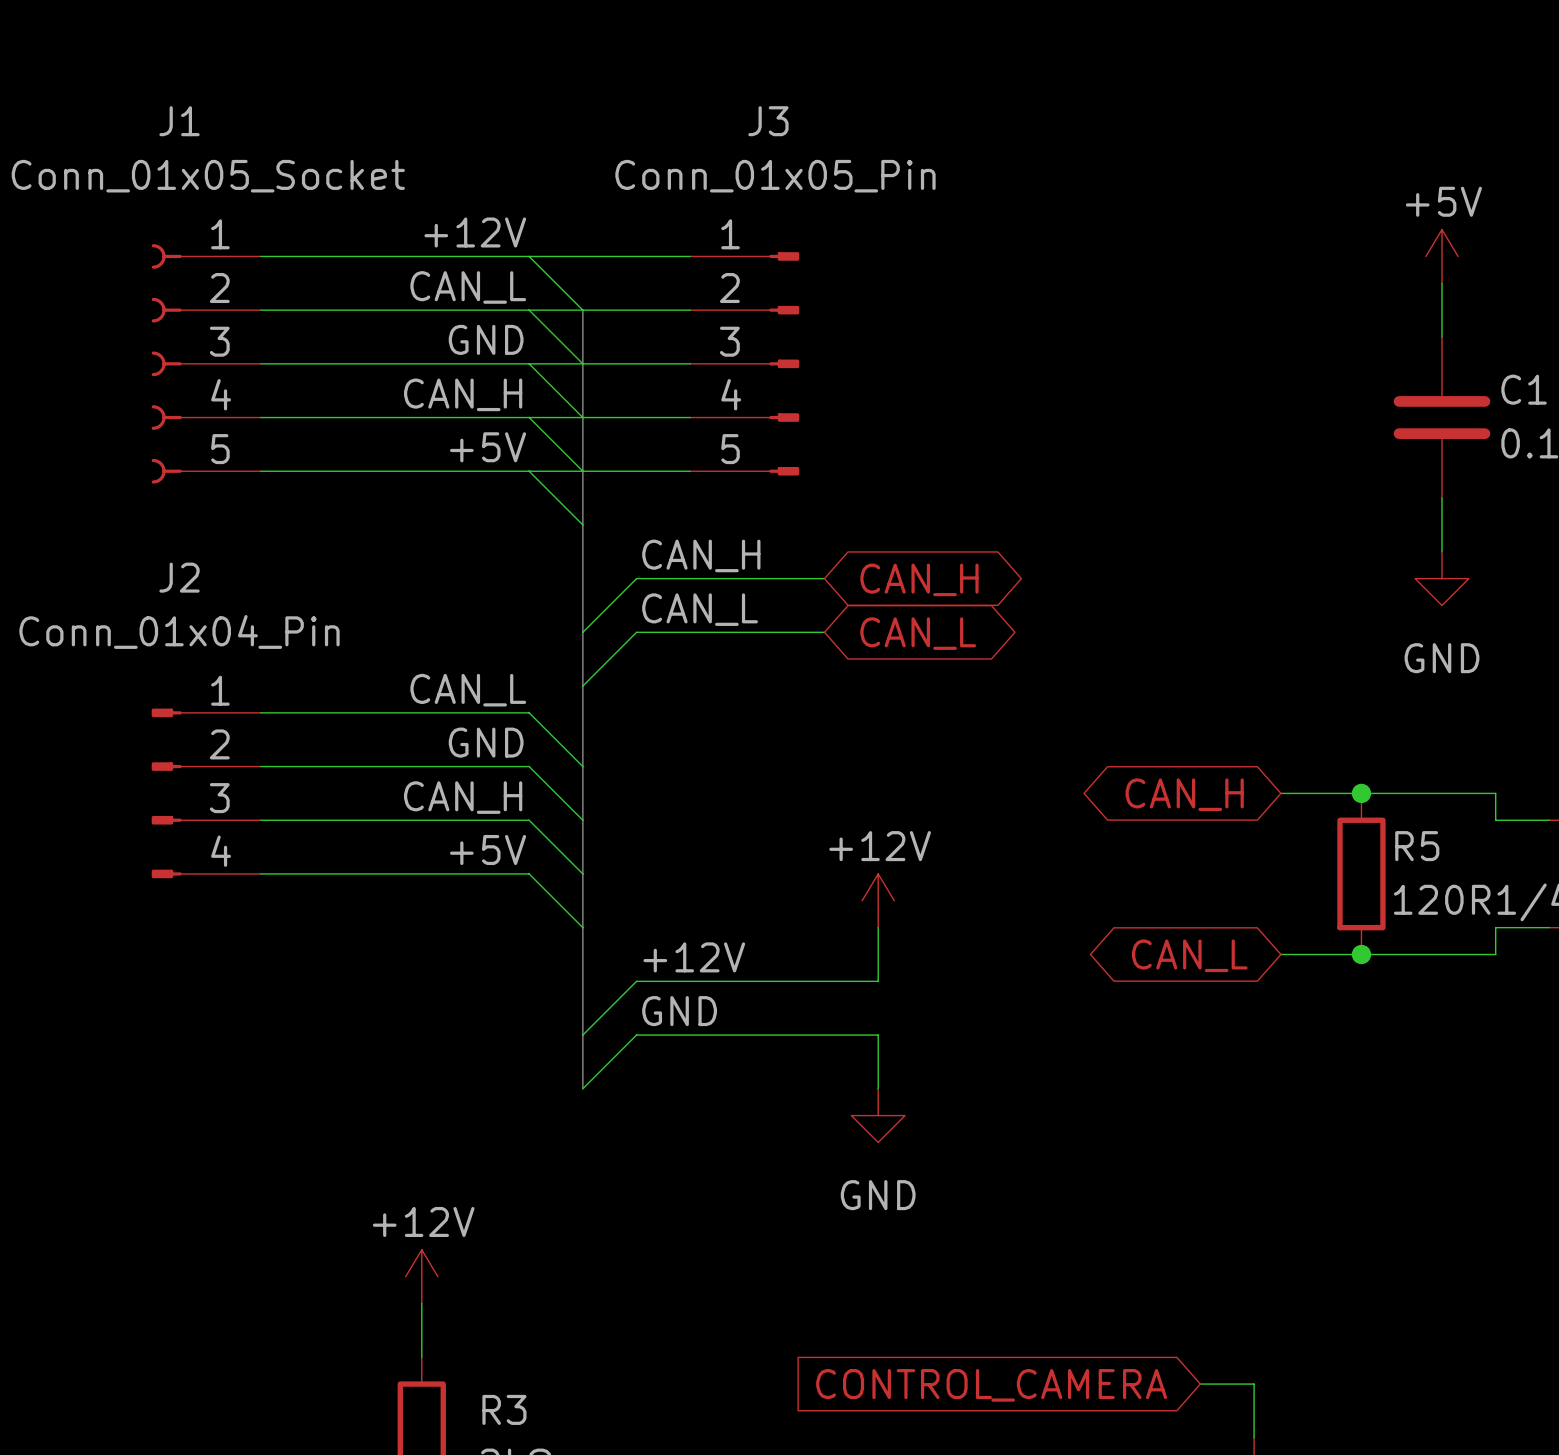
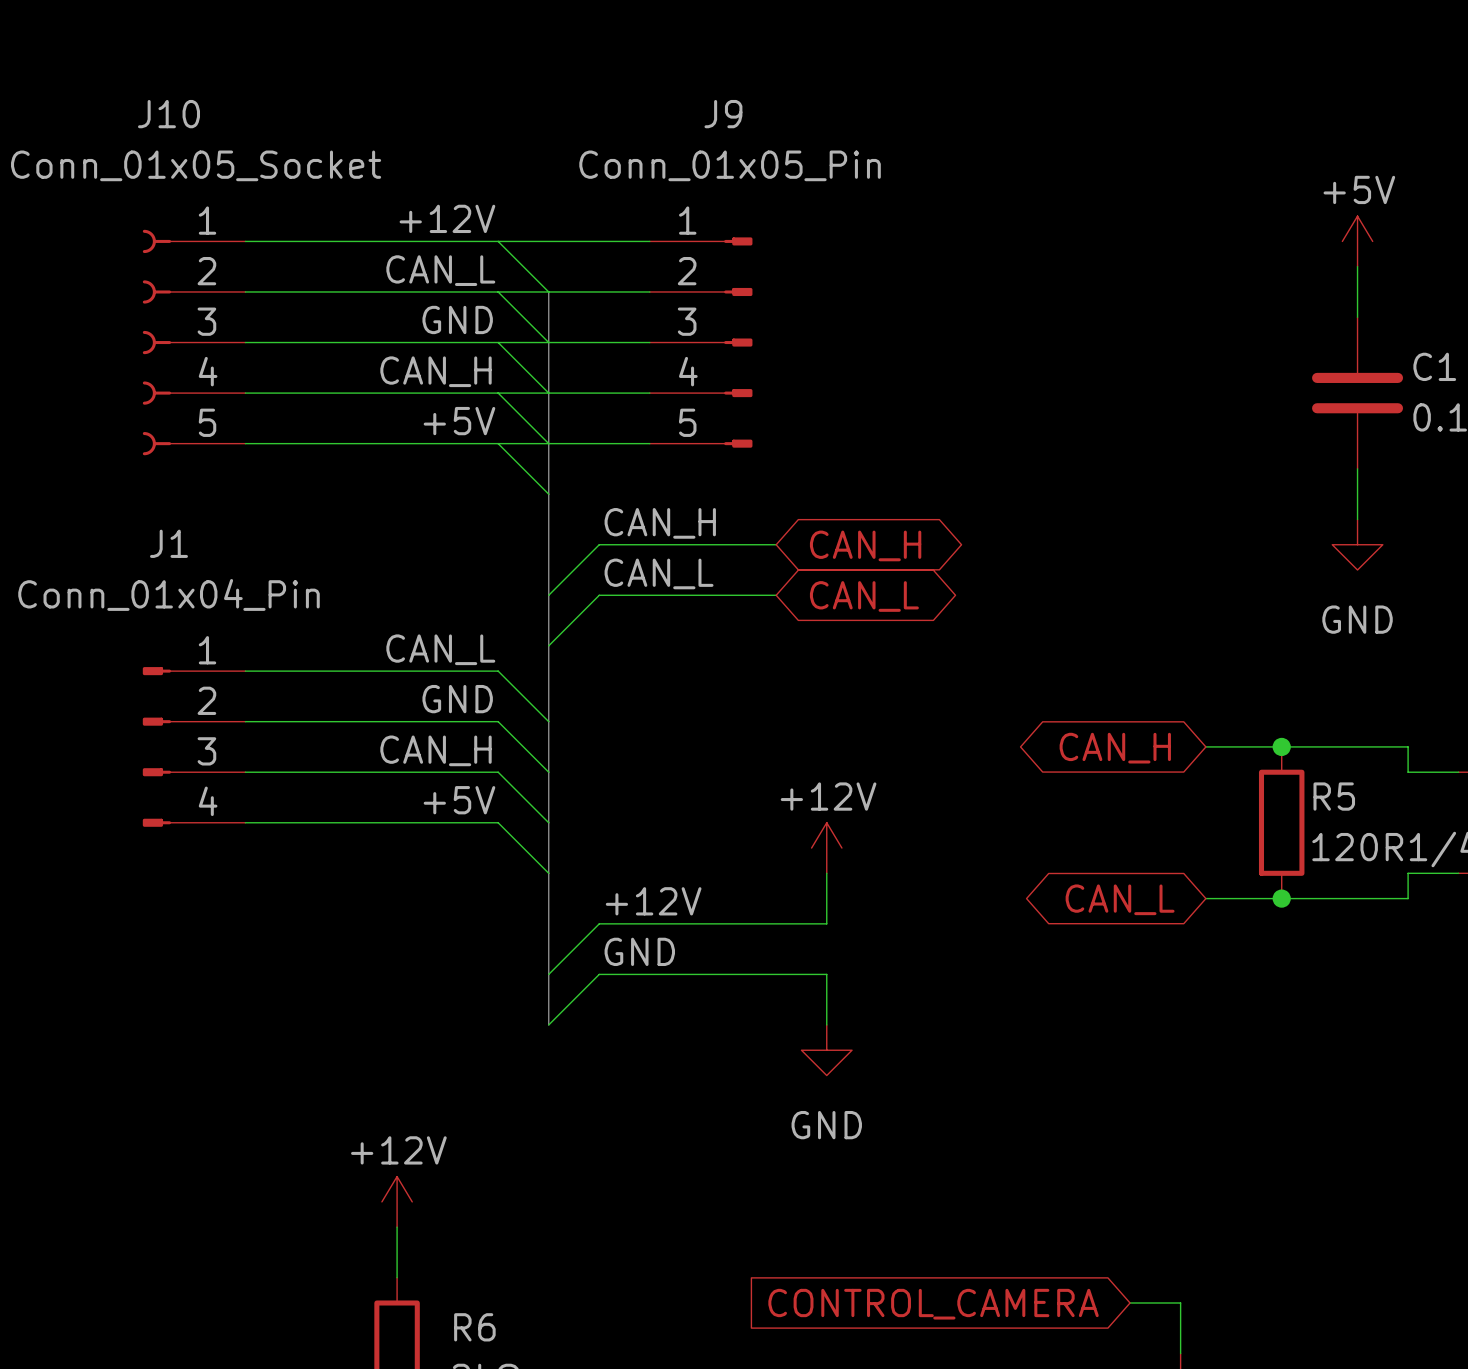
J1 name: J1 (179, 121) -> J10 (169, 114)
J3 name: J3 (768, 121) -> J9 (723, 114)
J2 name: J2 (179, 577) -> J1 (169, 543)
R3 name: R3 (504, 1409) -> R6 (474, 1327)

